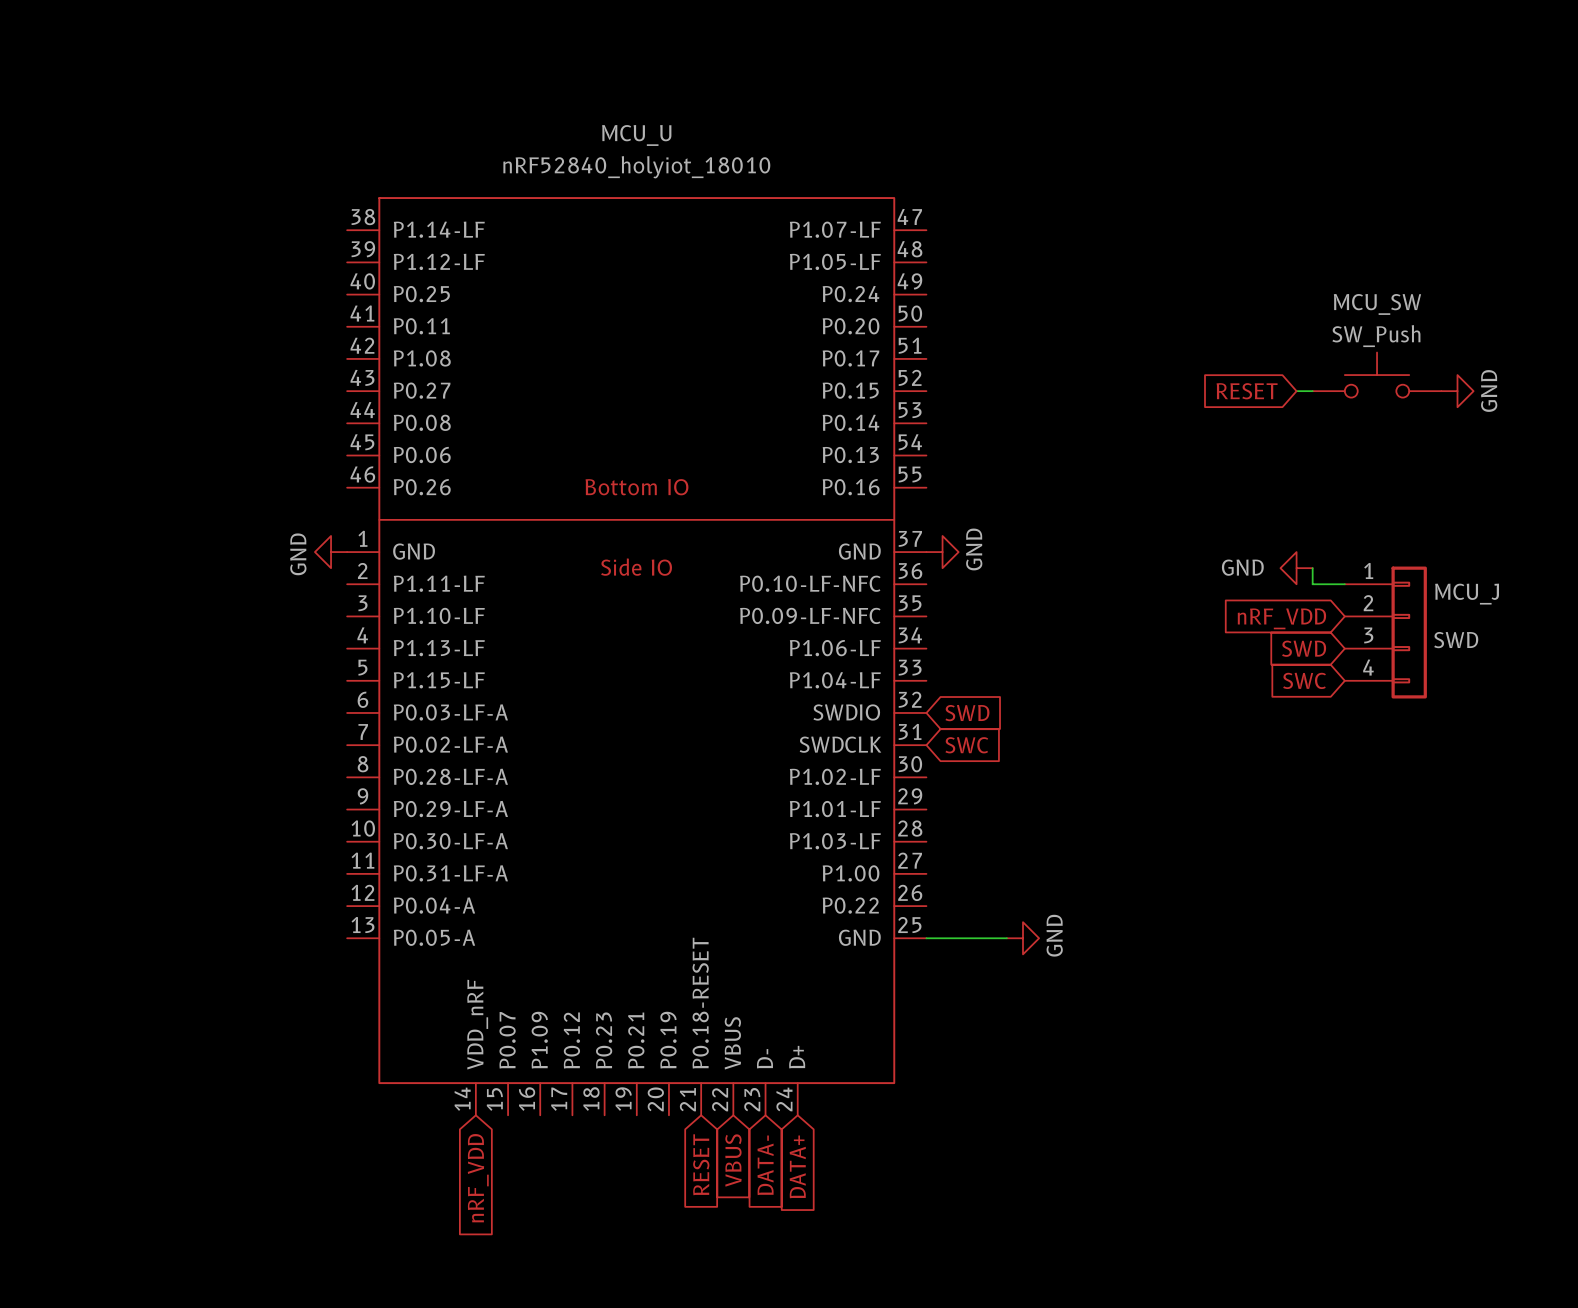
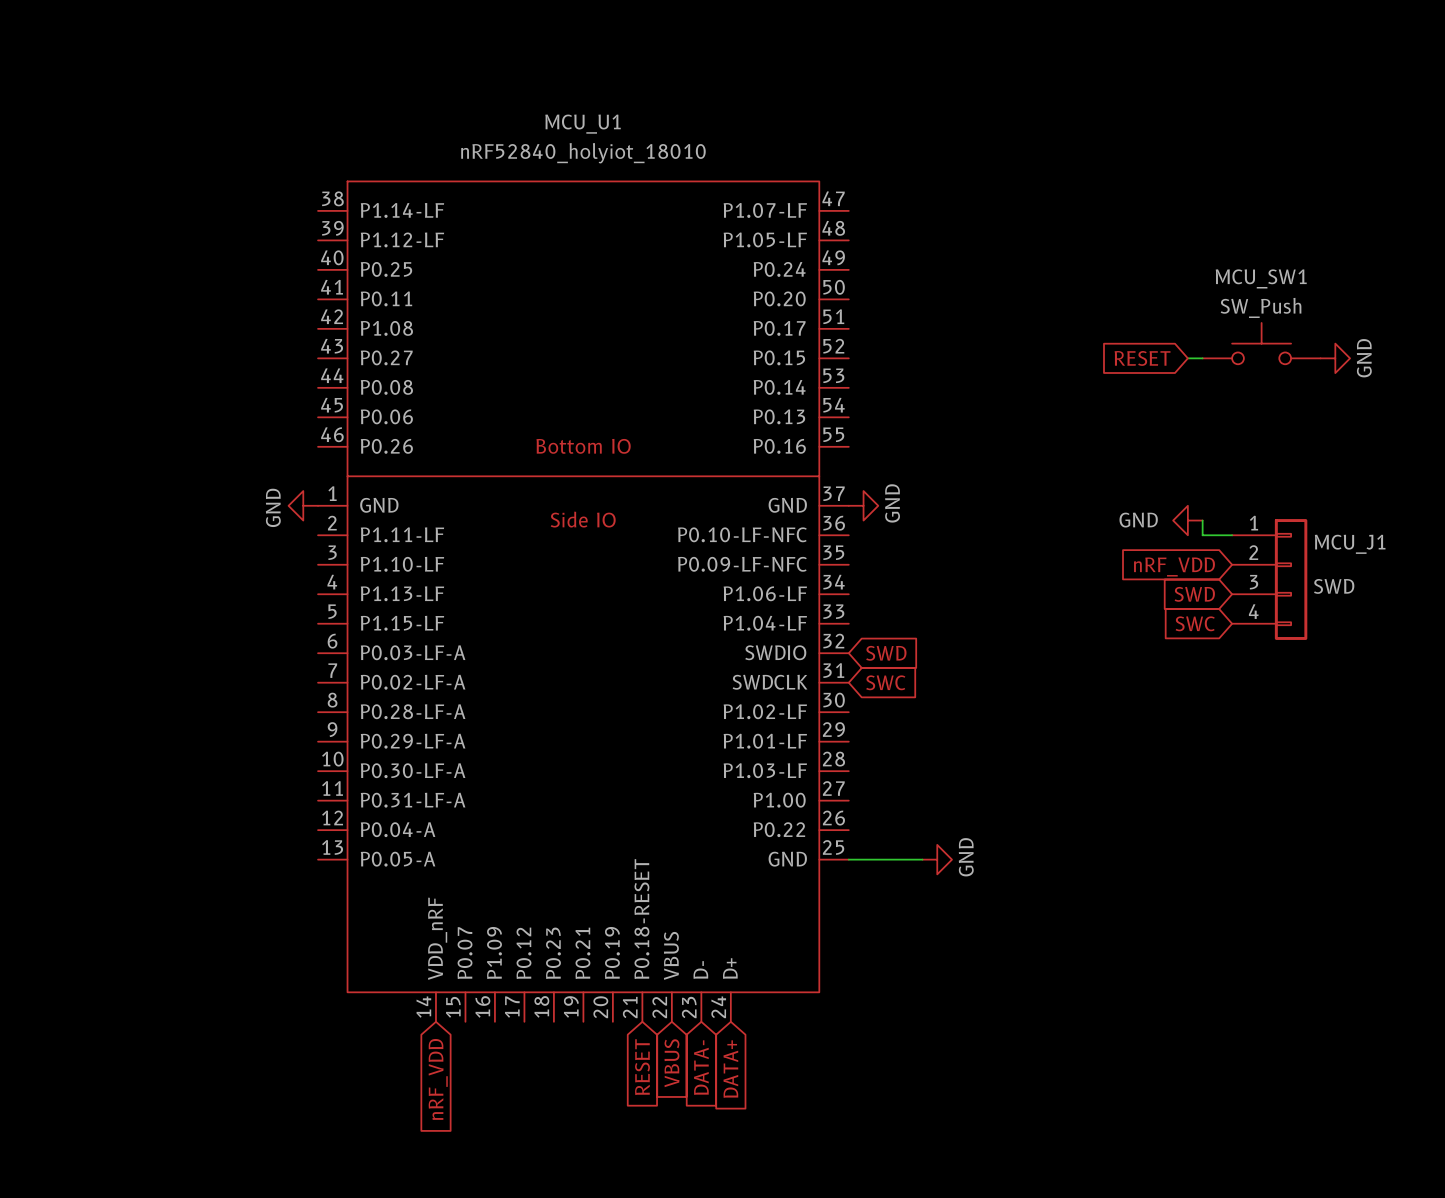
MCU_U name: MCU_U (636, 135) -> MCU_U1 (583, 124)
MCU_SW name: MCU_SW (1377, 304) -> MCU_SW1 (1261, 278)
MCU_J name: MCU_J (1467, 594) -> MCU_J1 (1350, 544)

